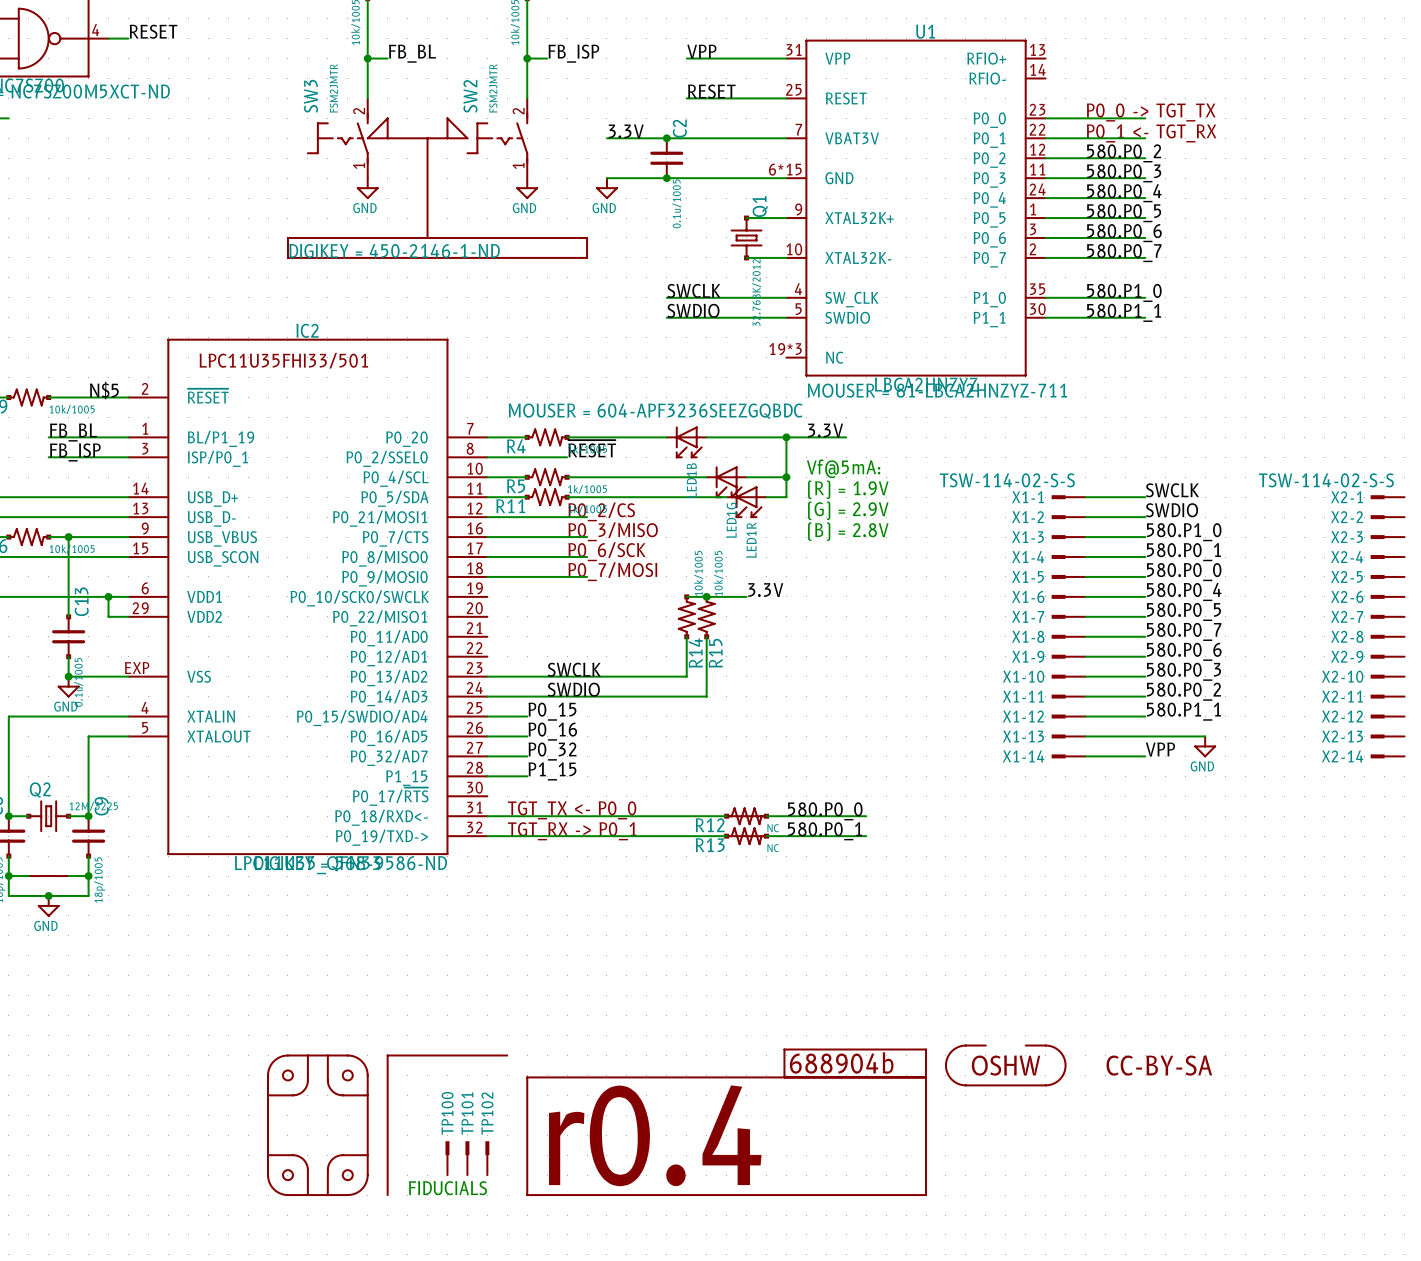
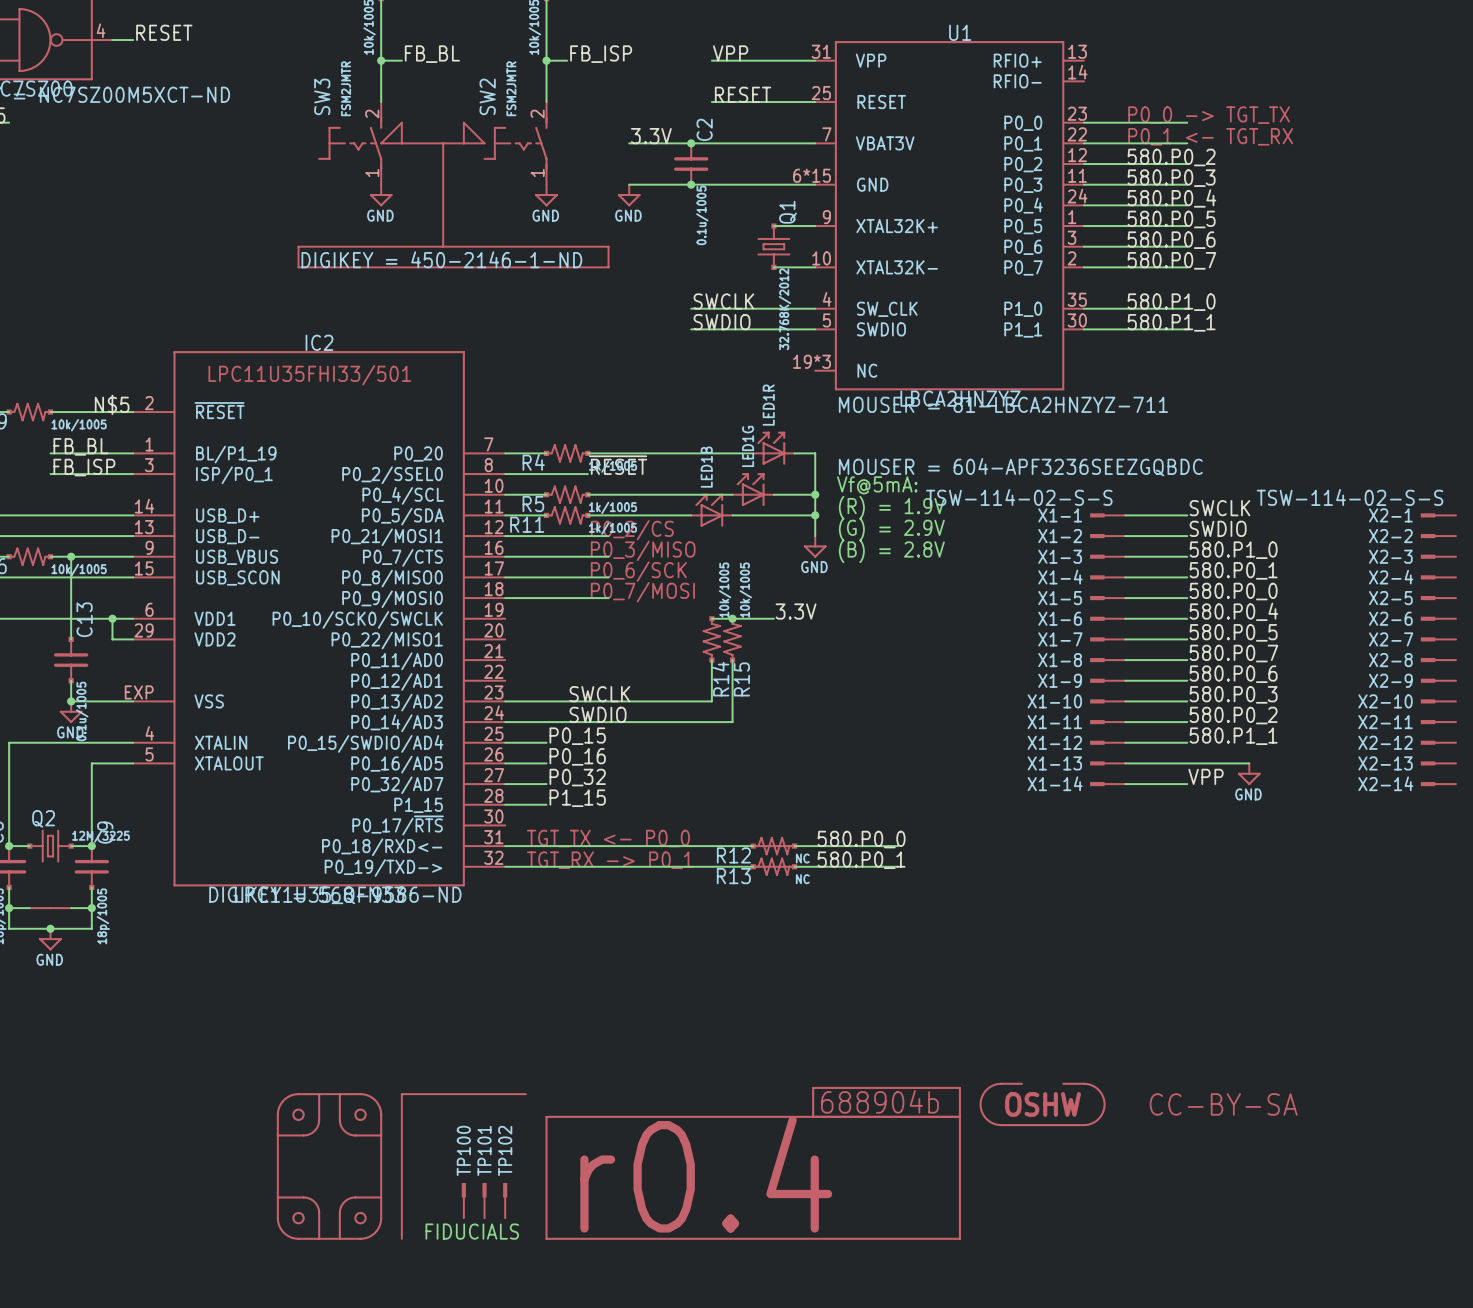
LED1G text position: MOUSER = 604-APF3236SEEZGQBDC (655, 411) -> MOUSER = 604-APF3236SEEZGQBDC (1020, 467)
label: 3.3V (825, 430) -> none
wire: (786, 437) (846, 437) -> none
junction: (786, 437) -> none
LED1B rotation: 0° (686, 442) -> 180° (711, 510)
LED1B position: (686, 442) -> (711, 510)
LED1G rotation: 0° (726, 482) -> 180° (753, 489)
wire: none -> (815, 515) (815, 536)
junction: none -> (815, 515)
LED1R rotation: 0° (746, 502) -> 180° (773, 448)
LED1R position: (746, 502) -> (773, 448)
power symbol: none -> GND (815, 546)

